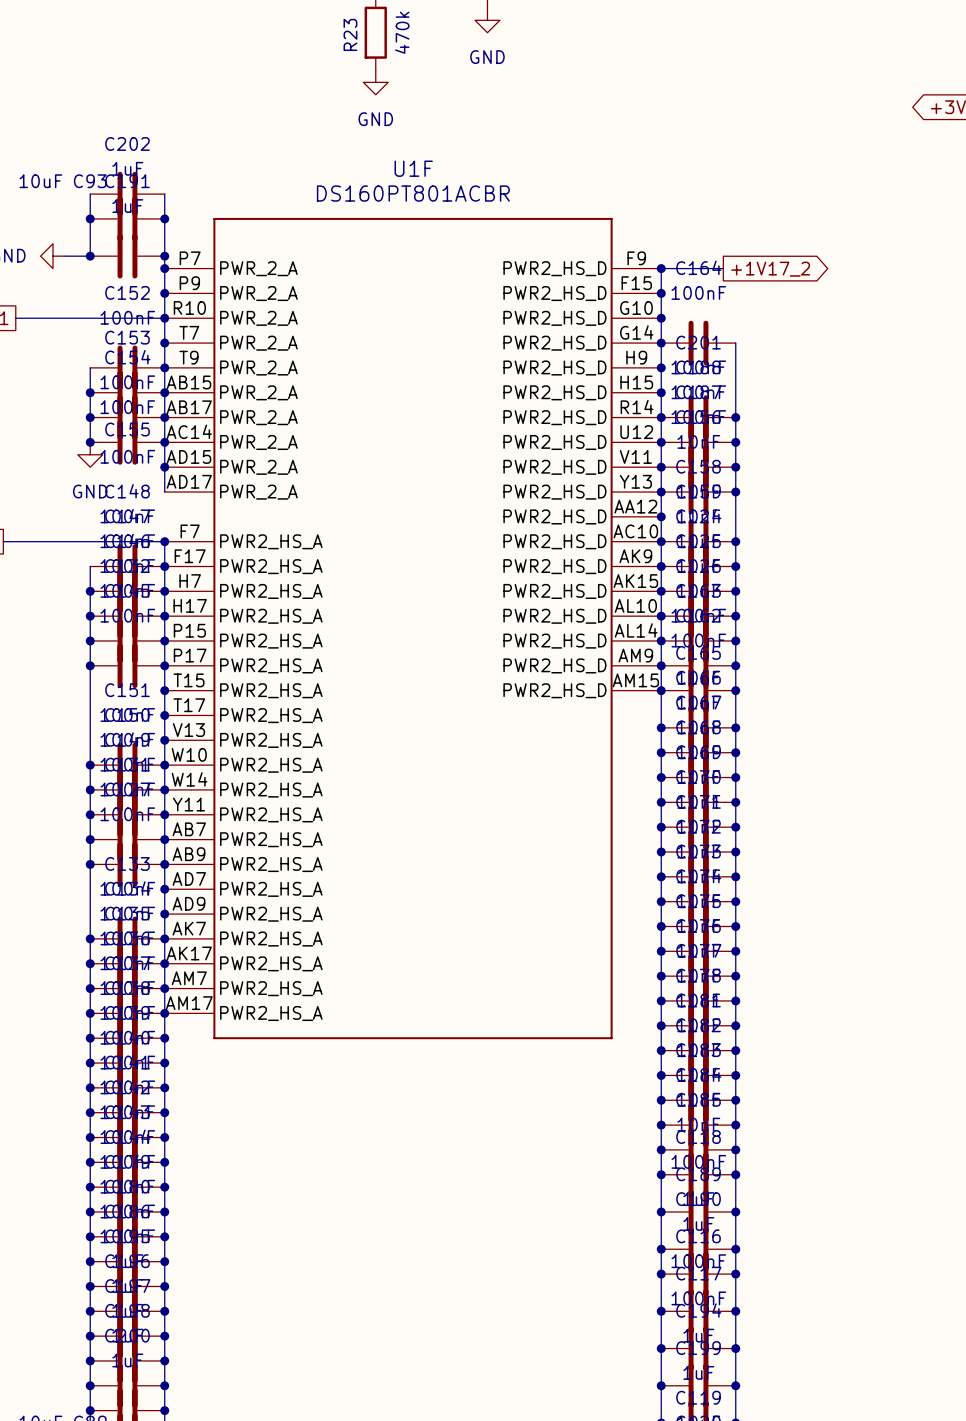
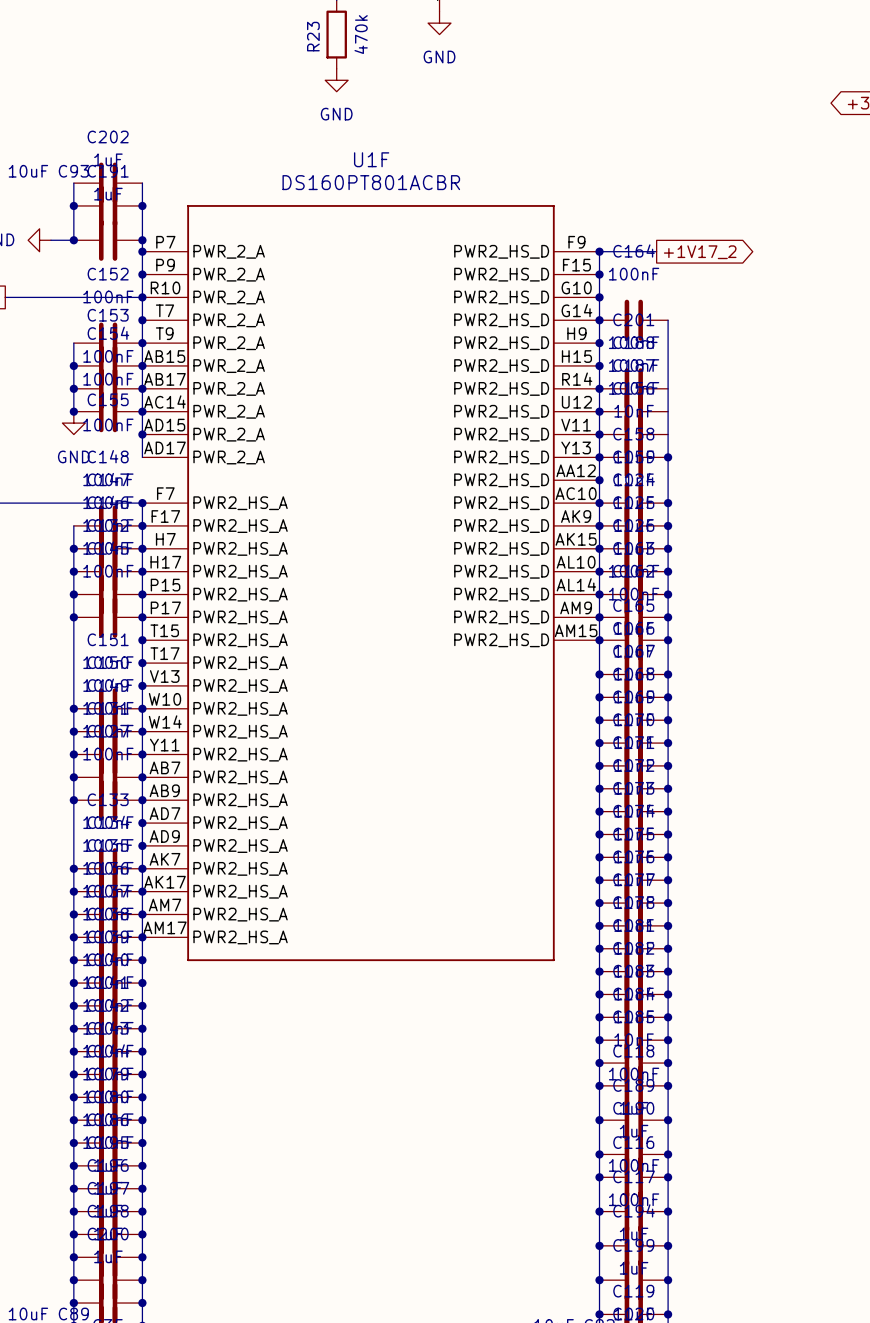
junction: (735, 417) -> none
junction: (735, 442) -> none
junction: (735, 467) -> none

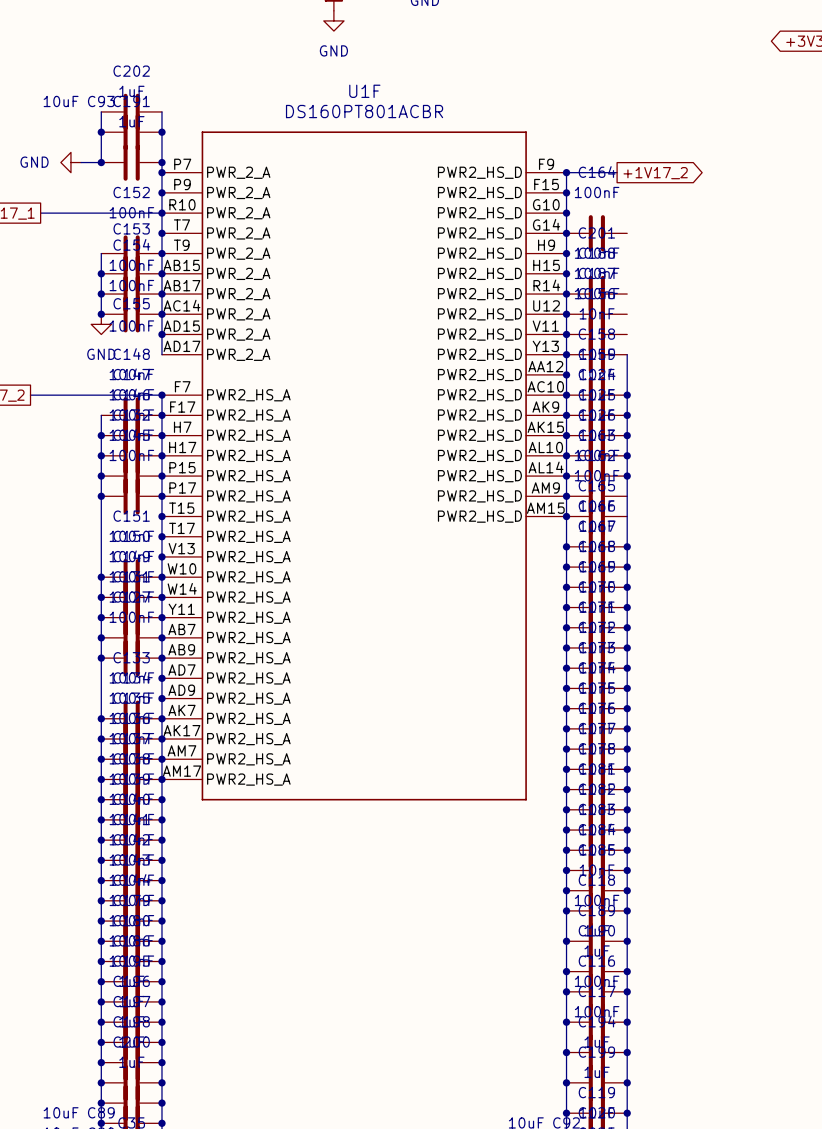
wire: (668, 320) (668, 457) -> none
junction: (668, 457) -> none
junction: (668, 617) -> none
junction: (668, 640) -> none

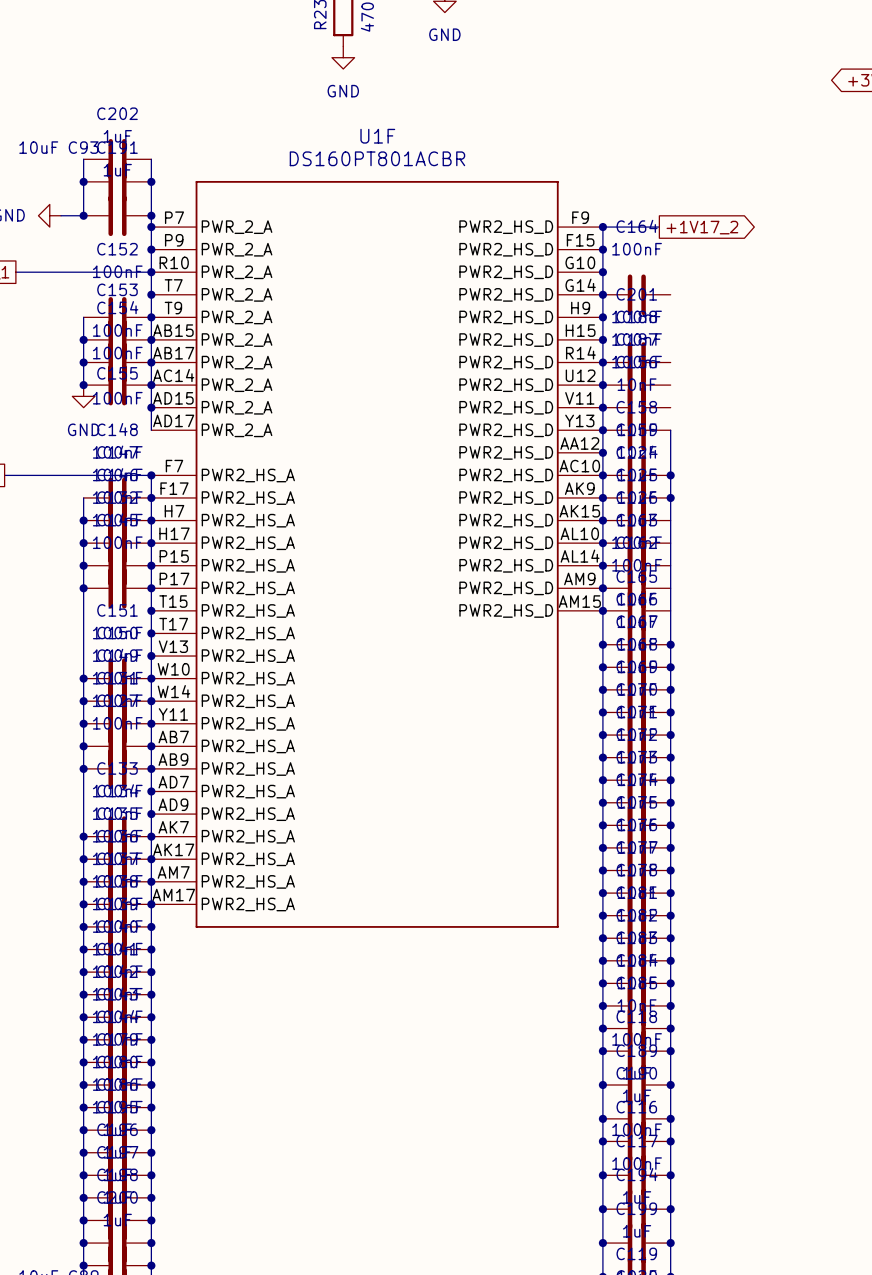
junction: (627, 435) -> none
junction: (627, 455) -> none
junction: (627, 476) -> none

